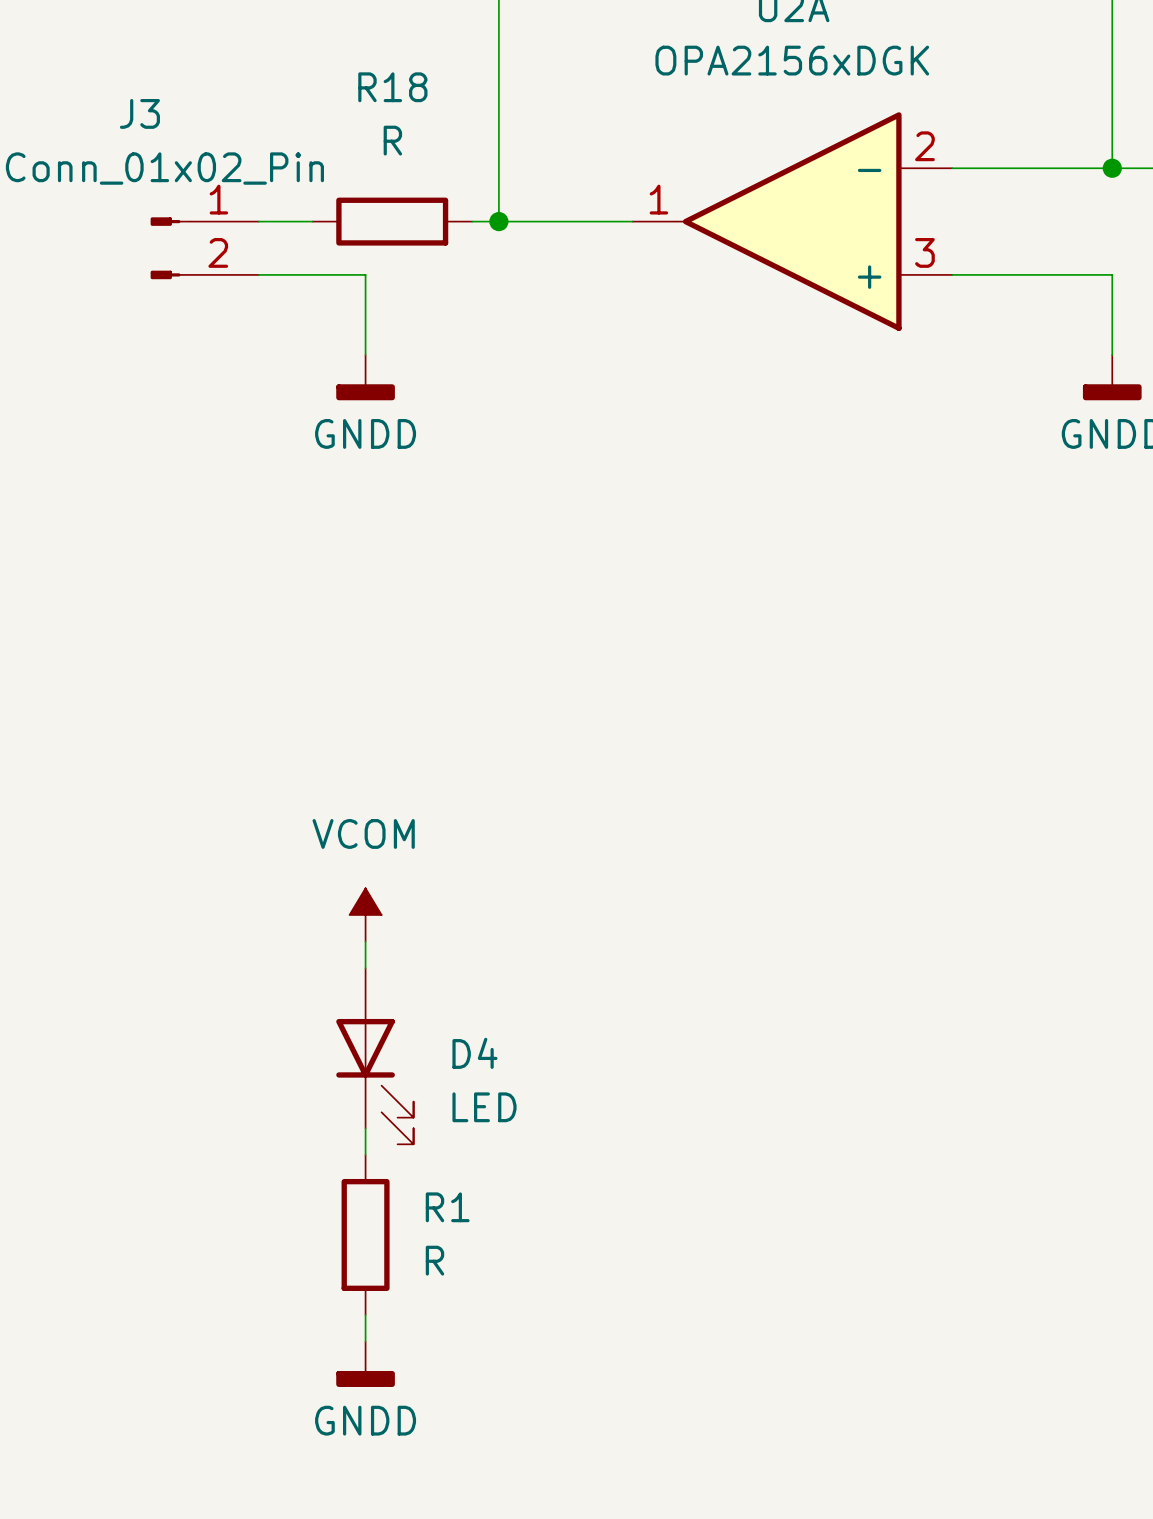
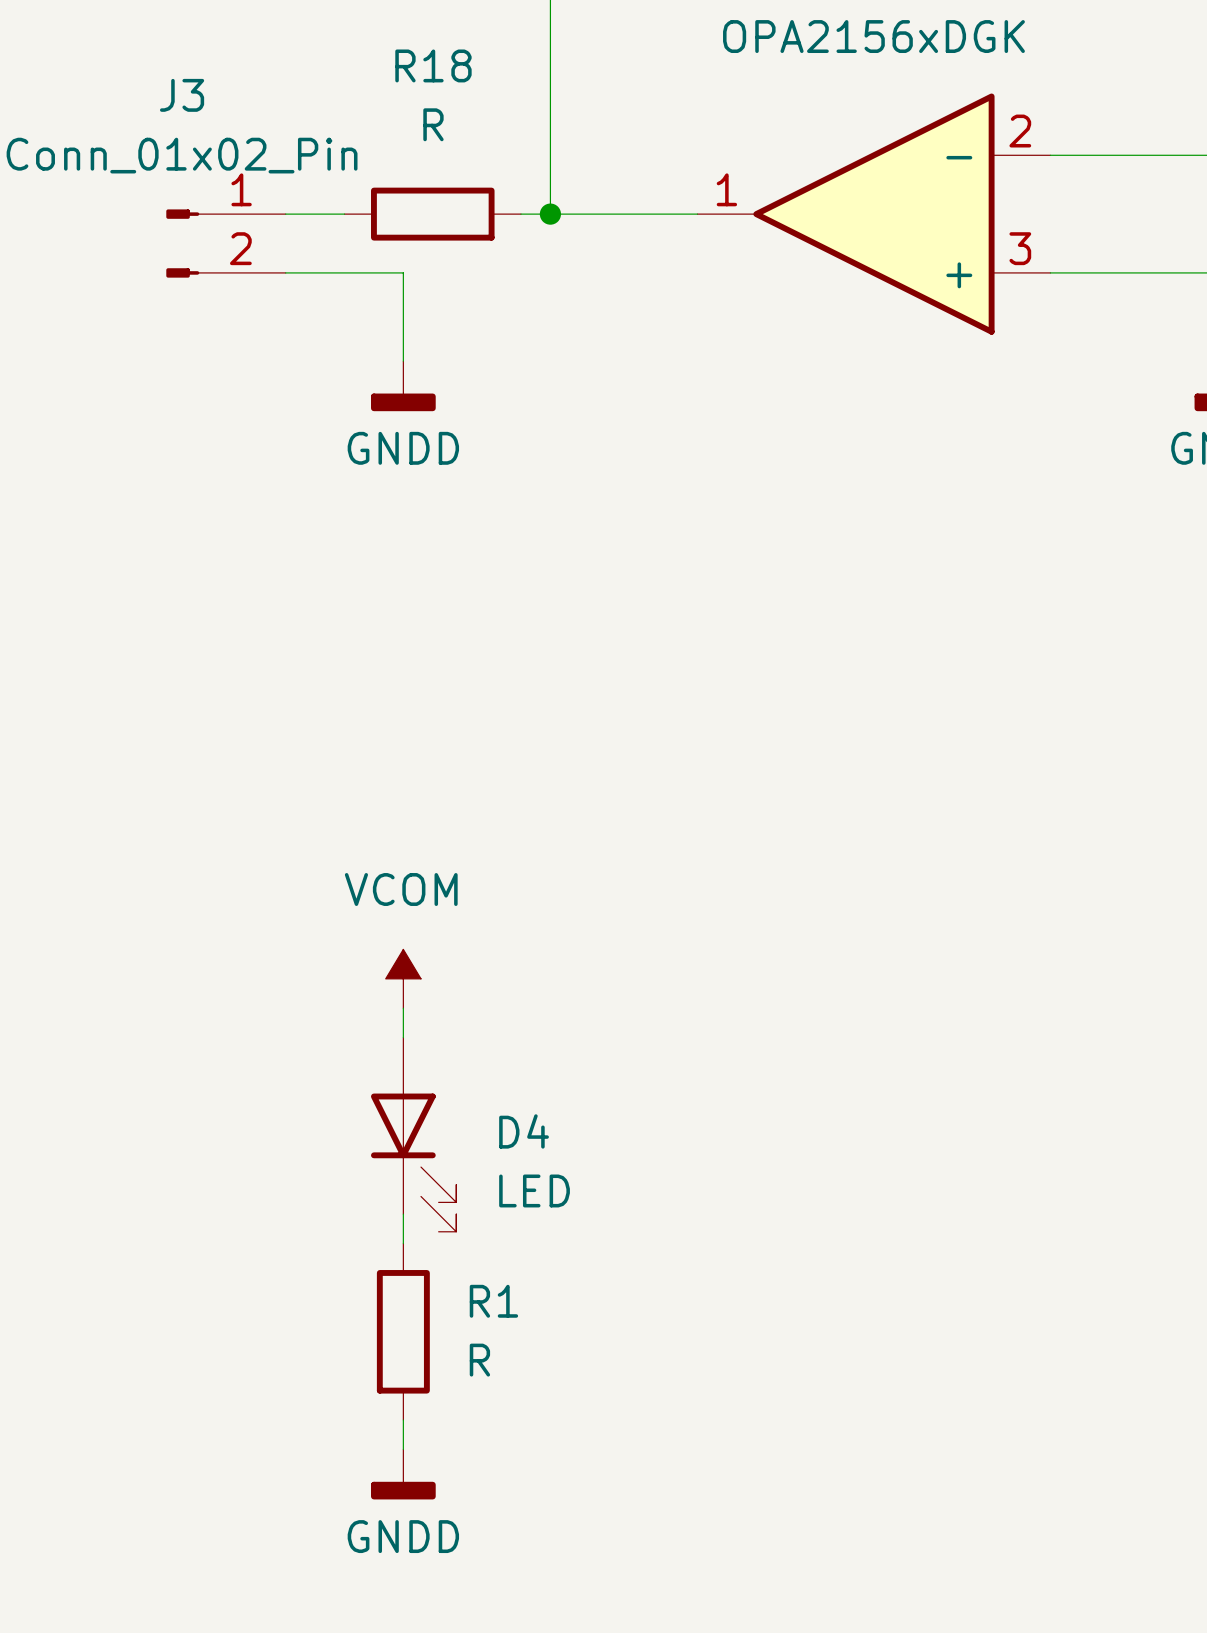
J3 name position: J3 (139, 113) -> J3 (182, 95)

